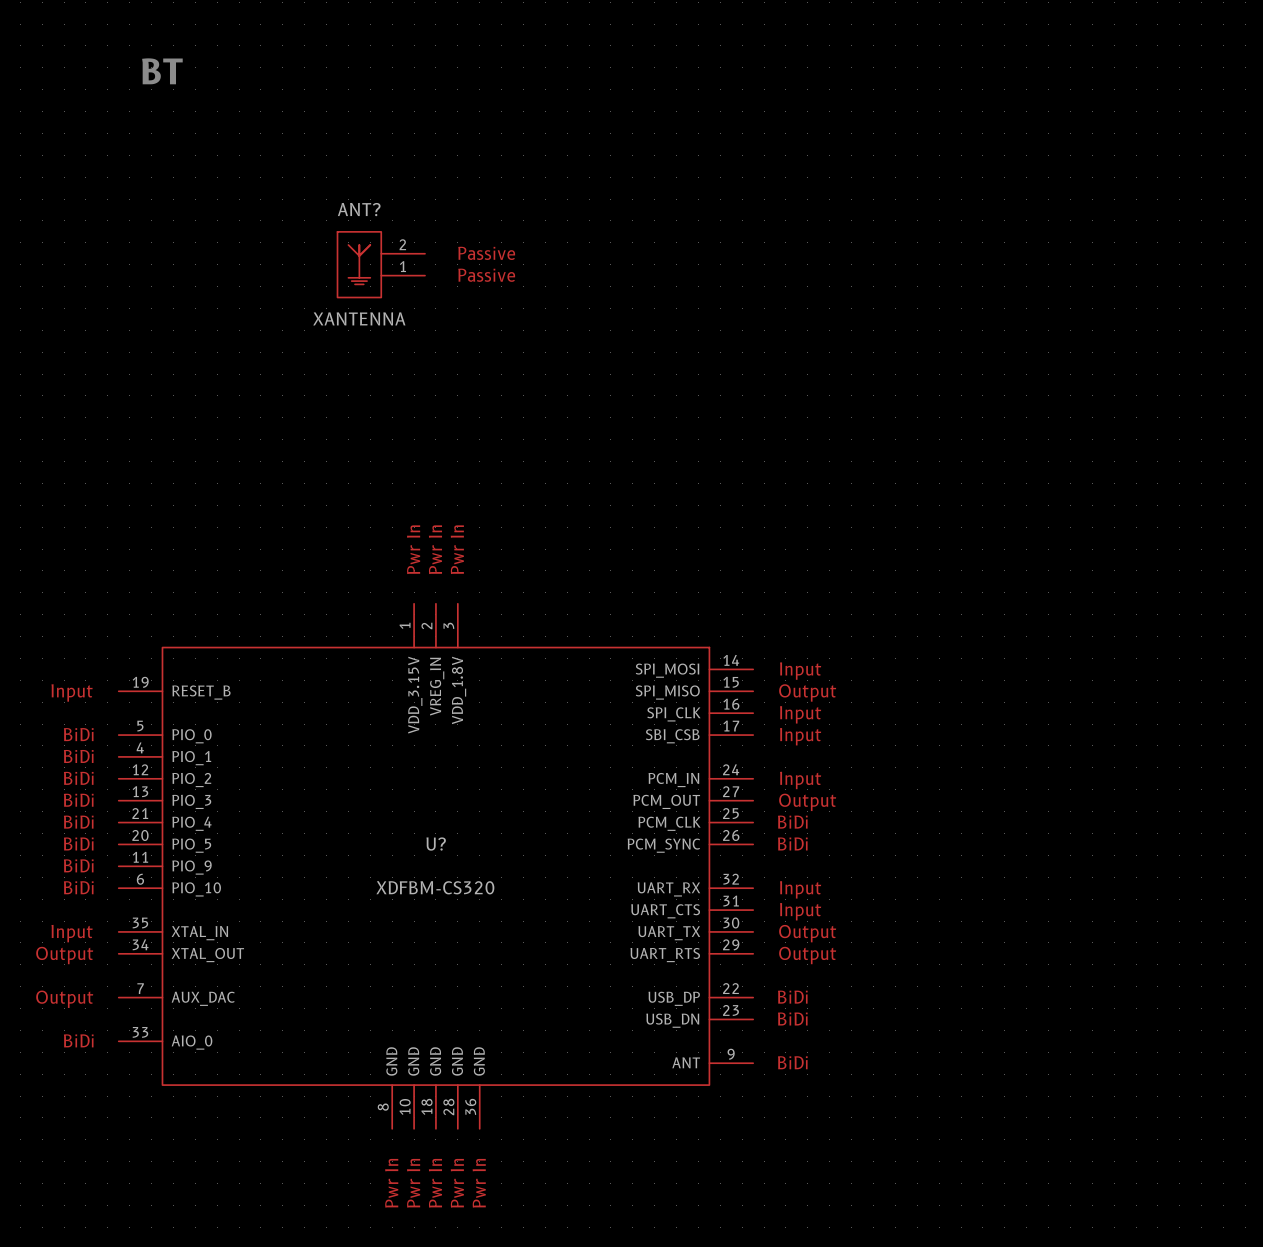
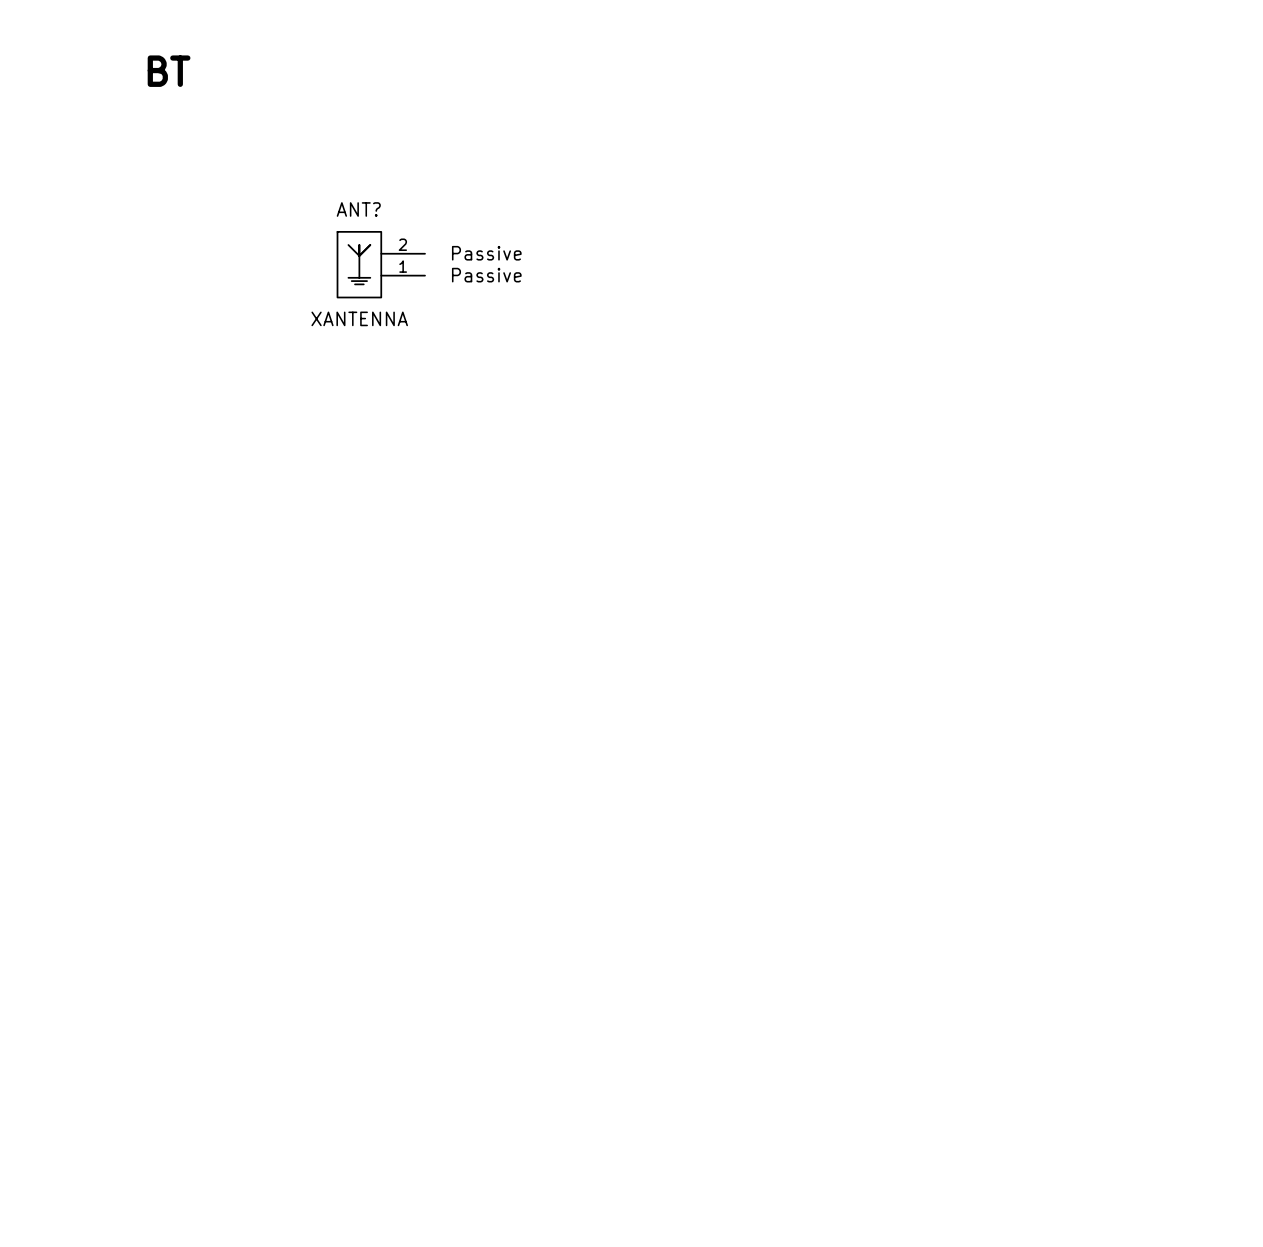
U?: XDFBM-CS320 (435, 866) -> none

